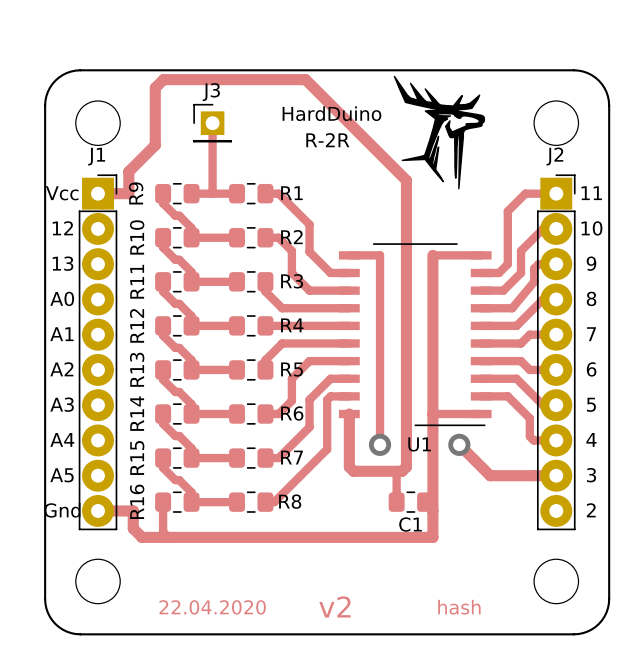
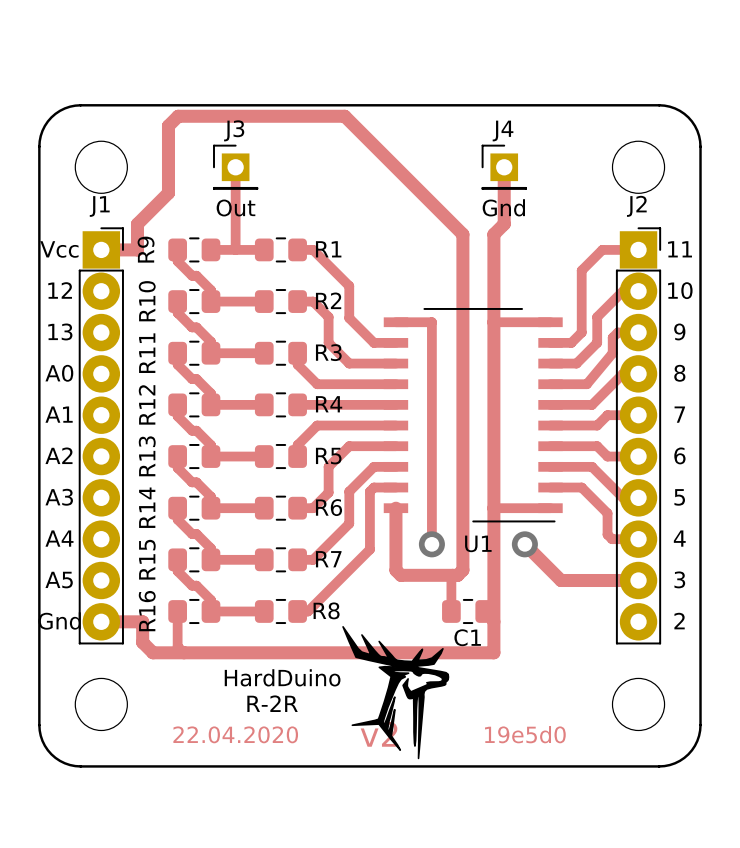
drawing: [393, 75, 486, 190] -> none
text: HardDuino (331, 113) -> none
track: none -> (504, 167) (504, 224) (493, 234) (493, 322)
J4: none -> (504, 167)
text: R-2R (327, 140) -> none
text: none -> Out (235, 208)
text: none -> Gnd (503, 207)
drawing: none -> [342, 626, 450, 760]
text: none -> HardDuino (282, 677)
text: none -> R-2R (272, 703)
text: hash (459, 607) -> 19e5d0 (525, 734)

